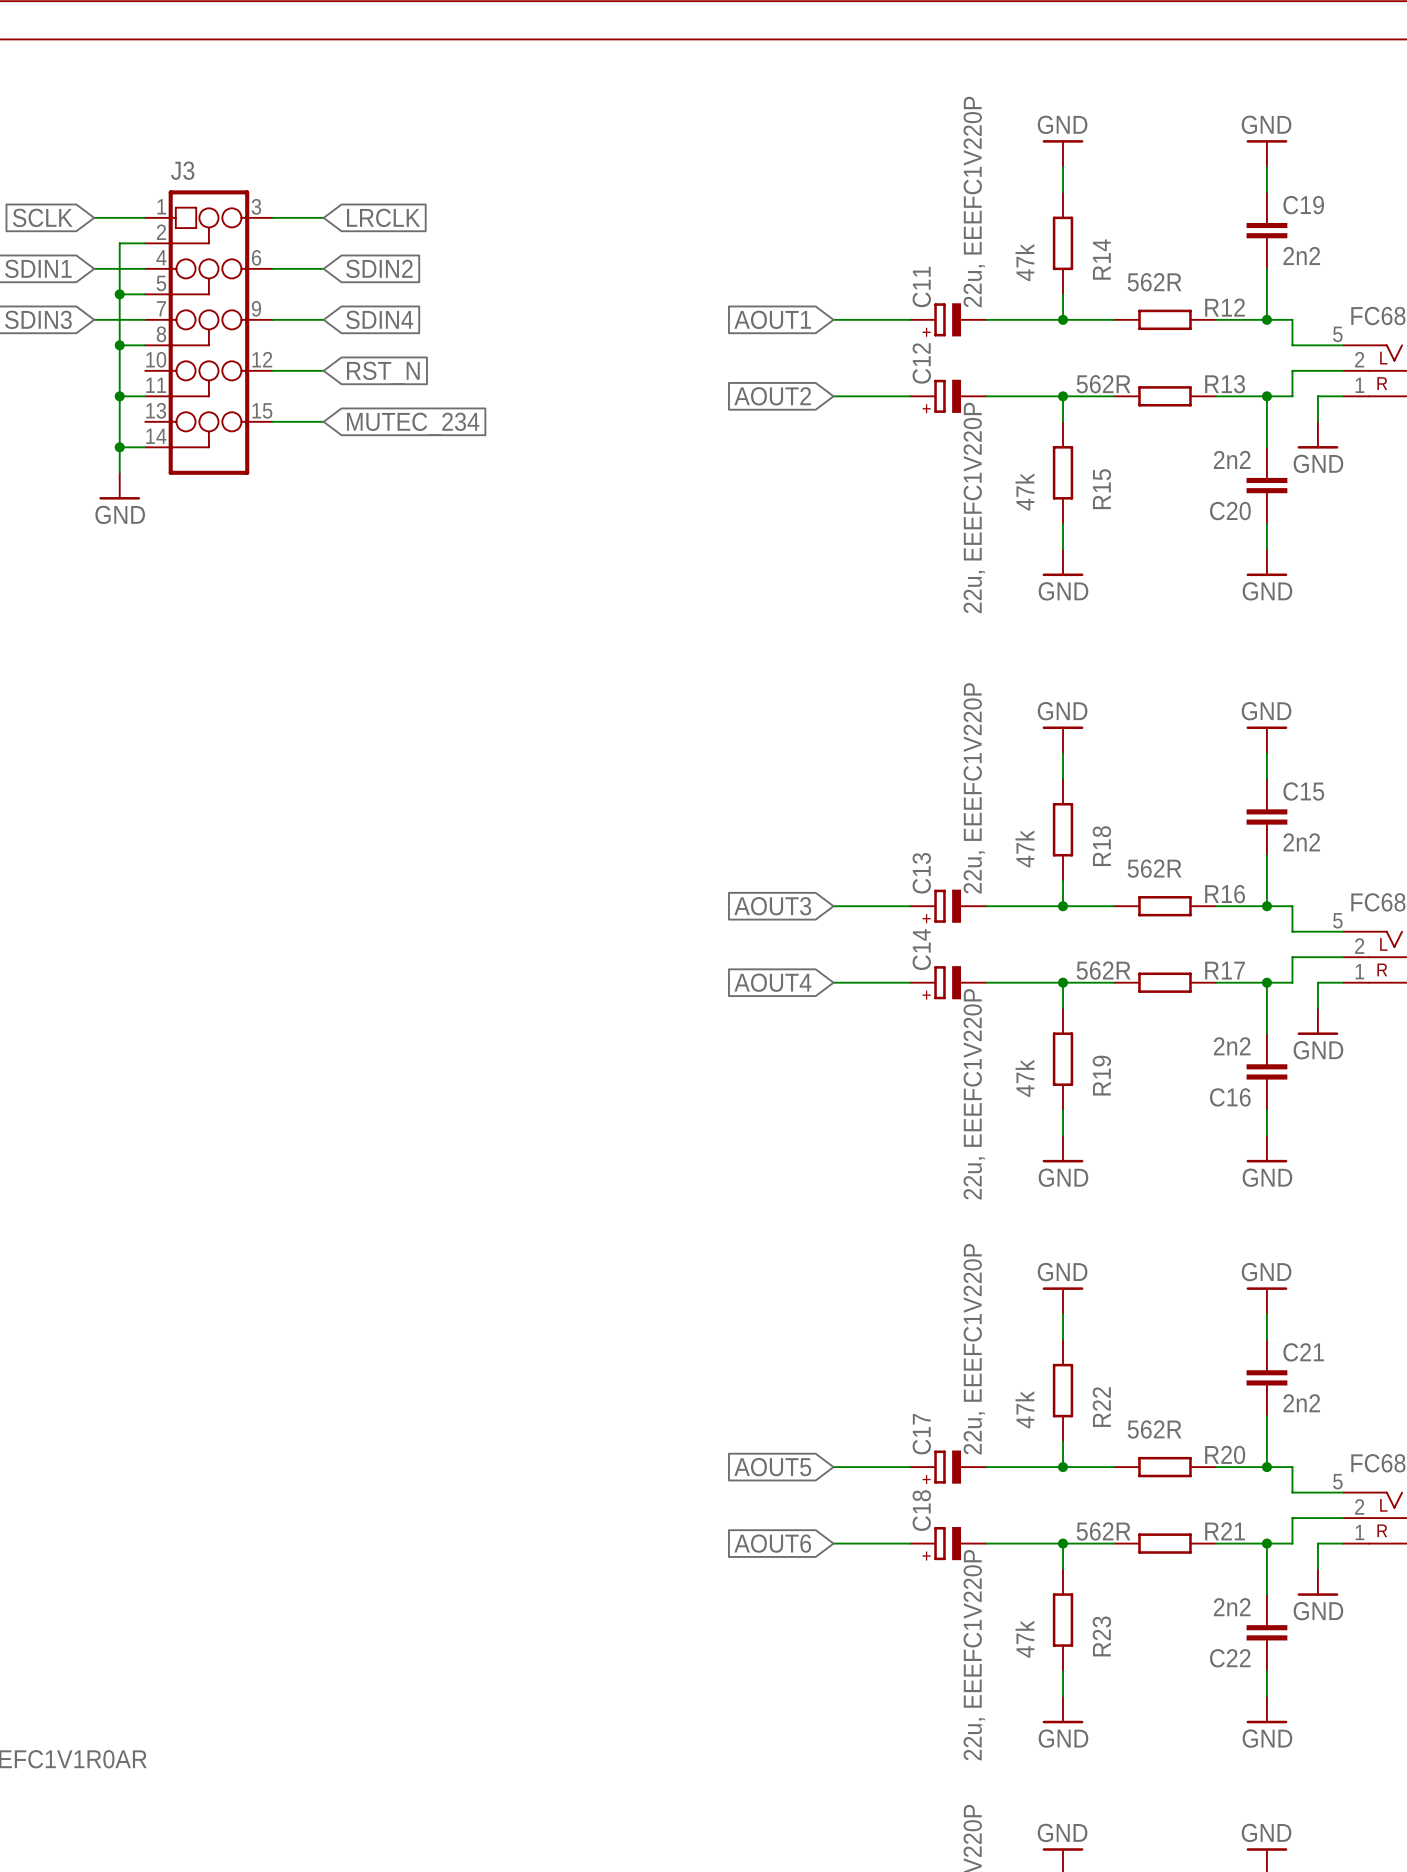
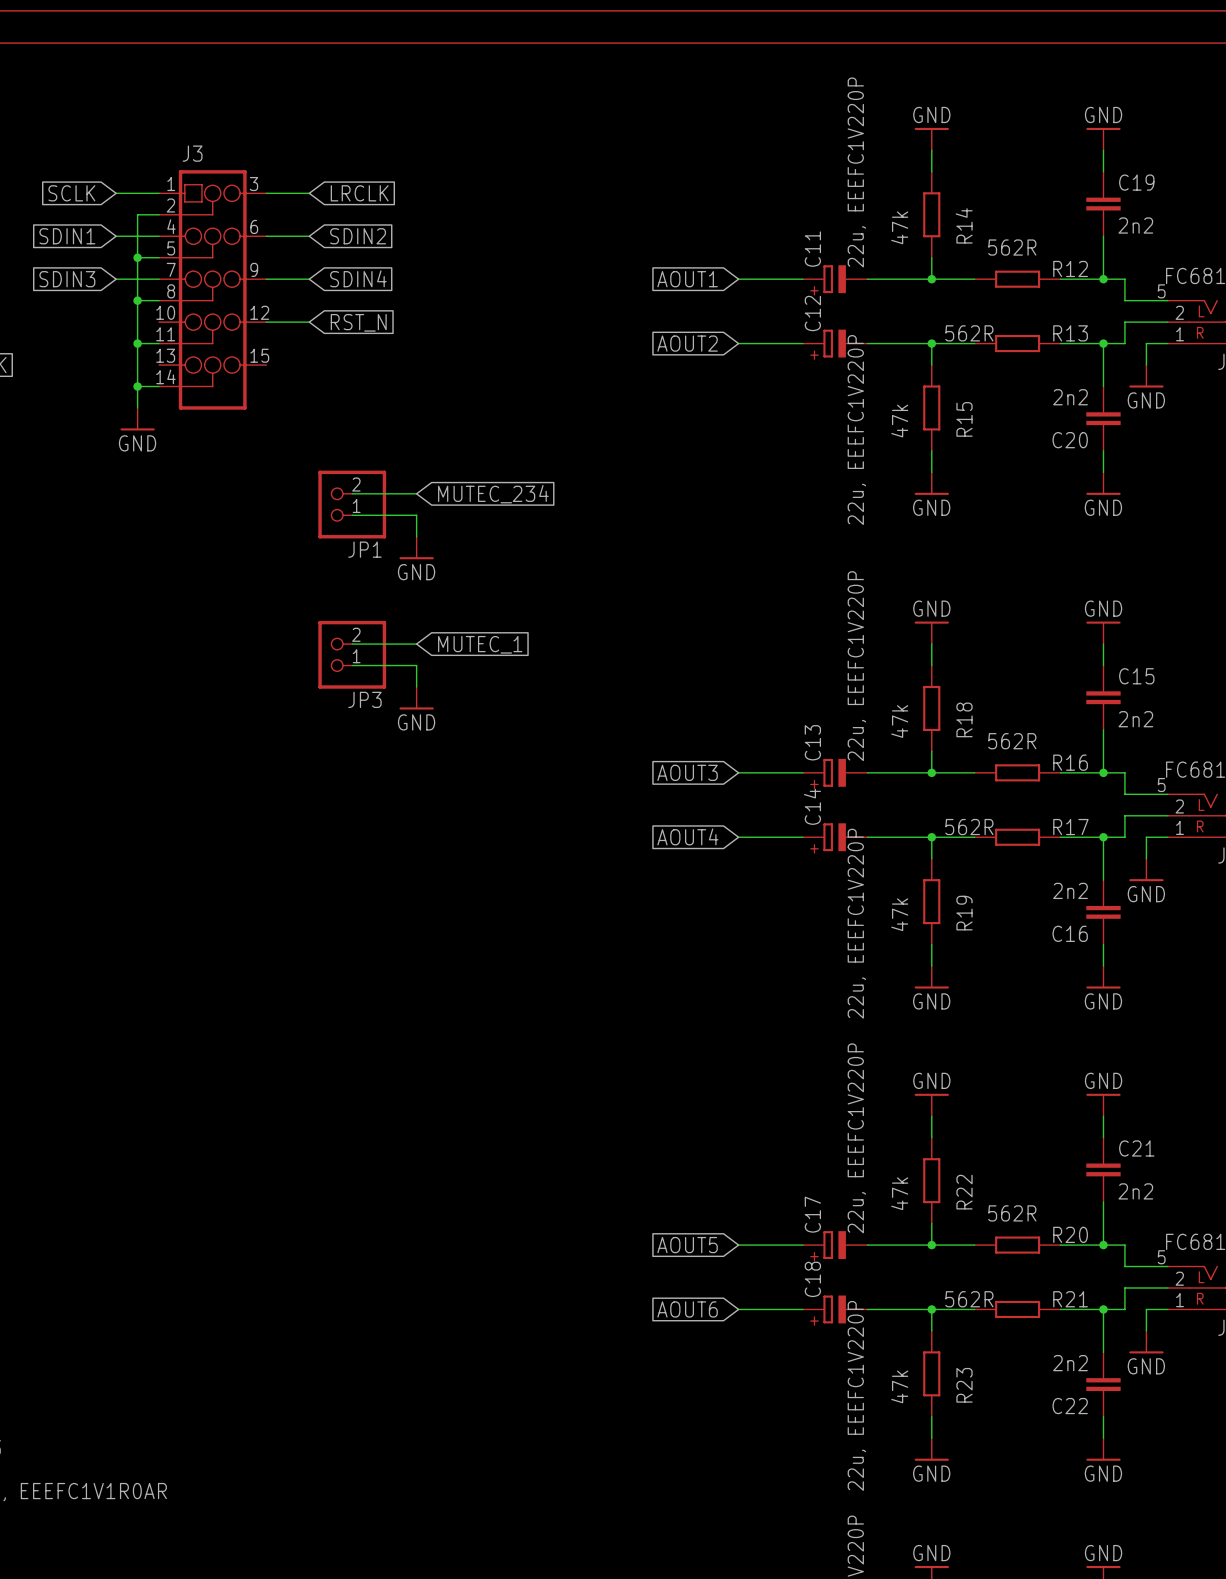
wire: (272, 421) (323, 421) -> none
global label position: MUTEC_234 (413, 424) -> MUTEC_234 (493, 494)
wire: none -> (352, 493) (416, 493)
JP1: none -> (352, 504)
wire: none -> (352, 515) (416, 515) (416, 536)
power symbol: none -> GND (416, 548)
wire: none -> (352, 644) (416, 644)
global label: none -> MUTEC_1 (480, 644)
JP3: none -> (352, 654)
wire: none -> (352, 665) (416, 665) (416, 687)
power symbol: none -> GND (416, 698)

